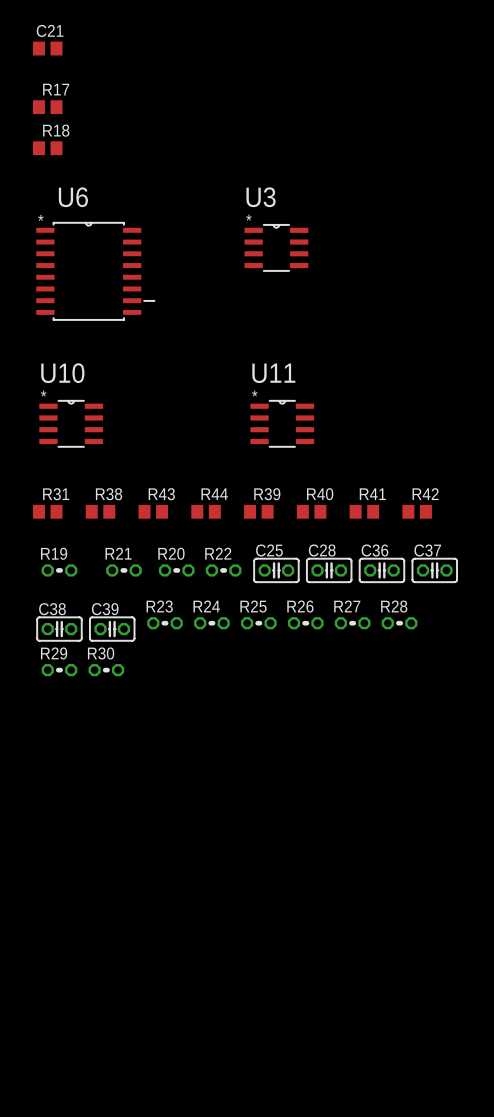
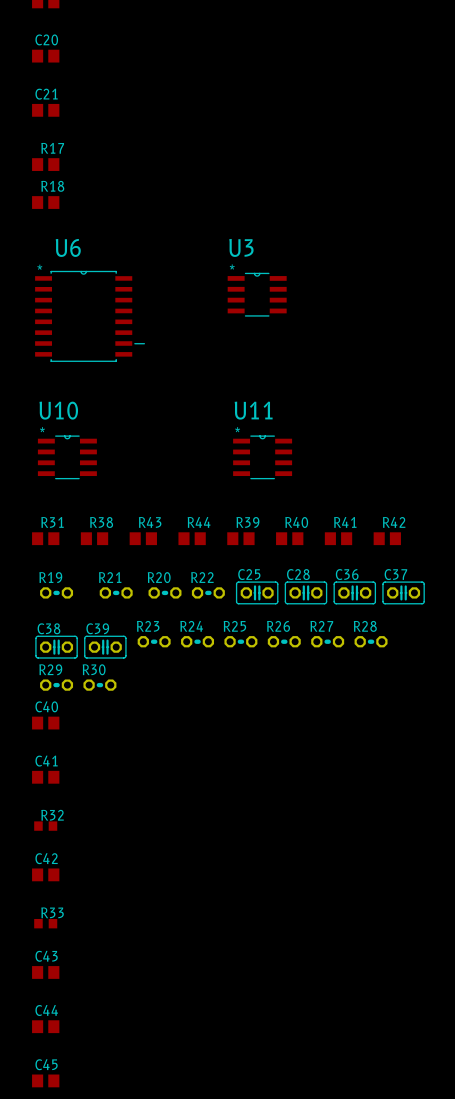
C40: none -> (45, 723)
C41: none -> (45, 777)
R32: none -> (45, 826)
C42: none -> (45, 874)
R33: none -> (45, 923)
C43: none -> (45, 972)
C44: none -> (45, 1026)
C45: none -> (45, 1080)

